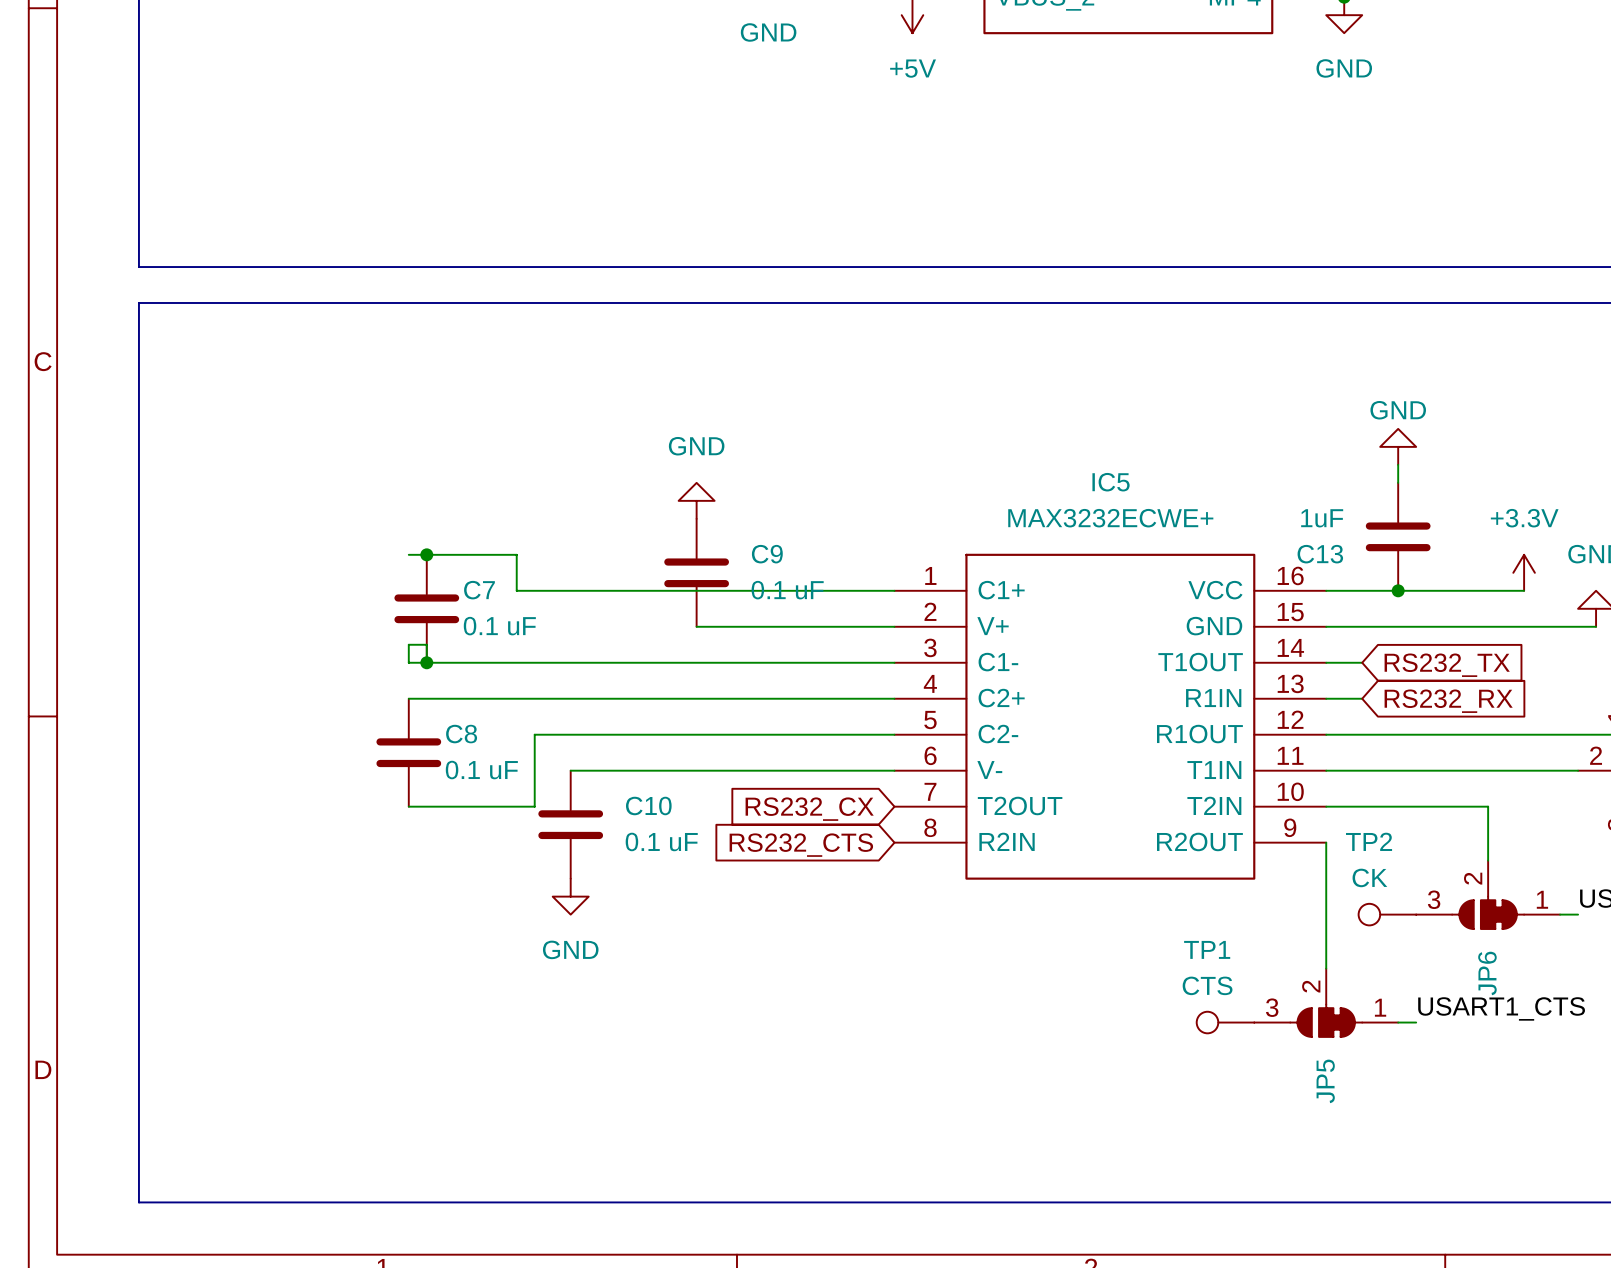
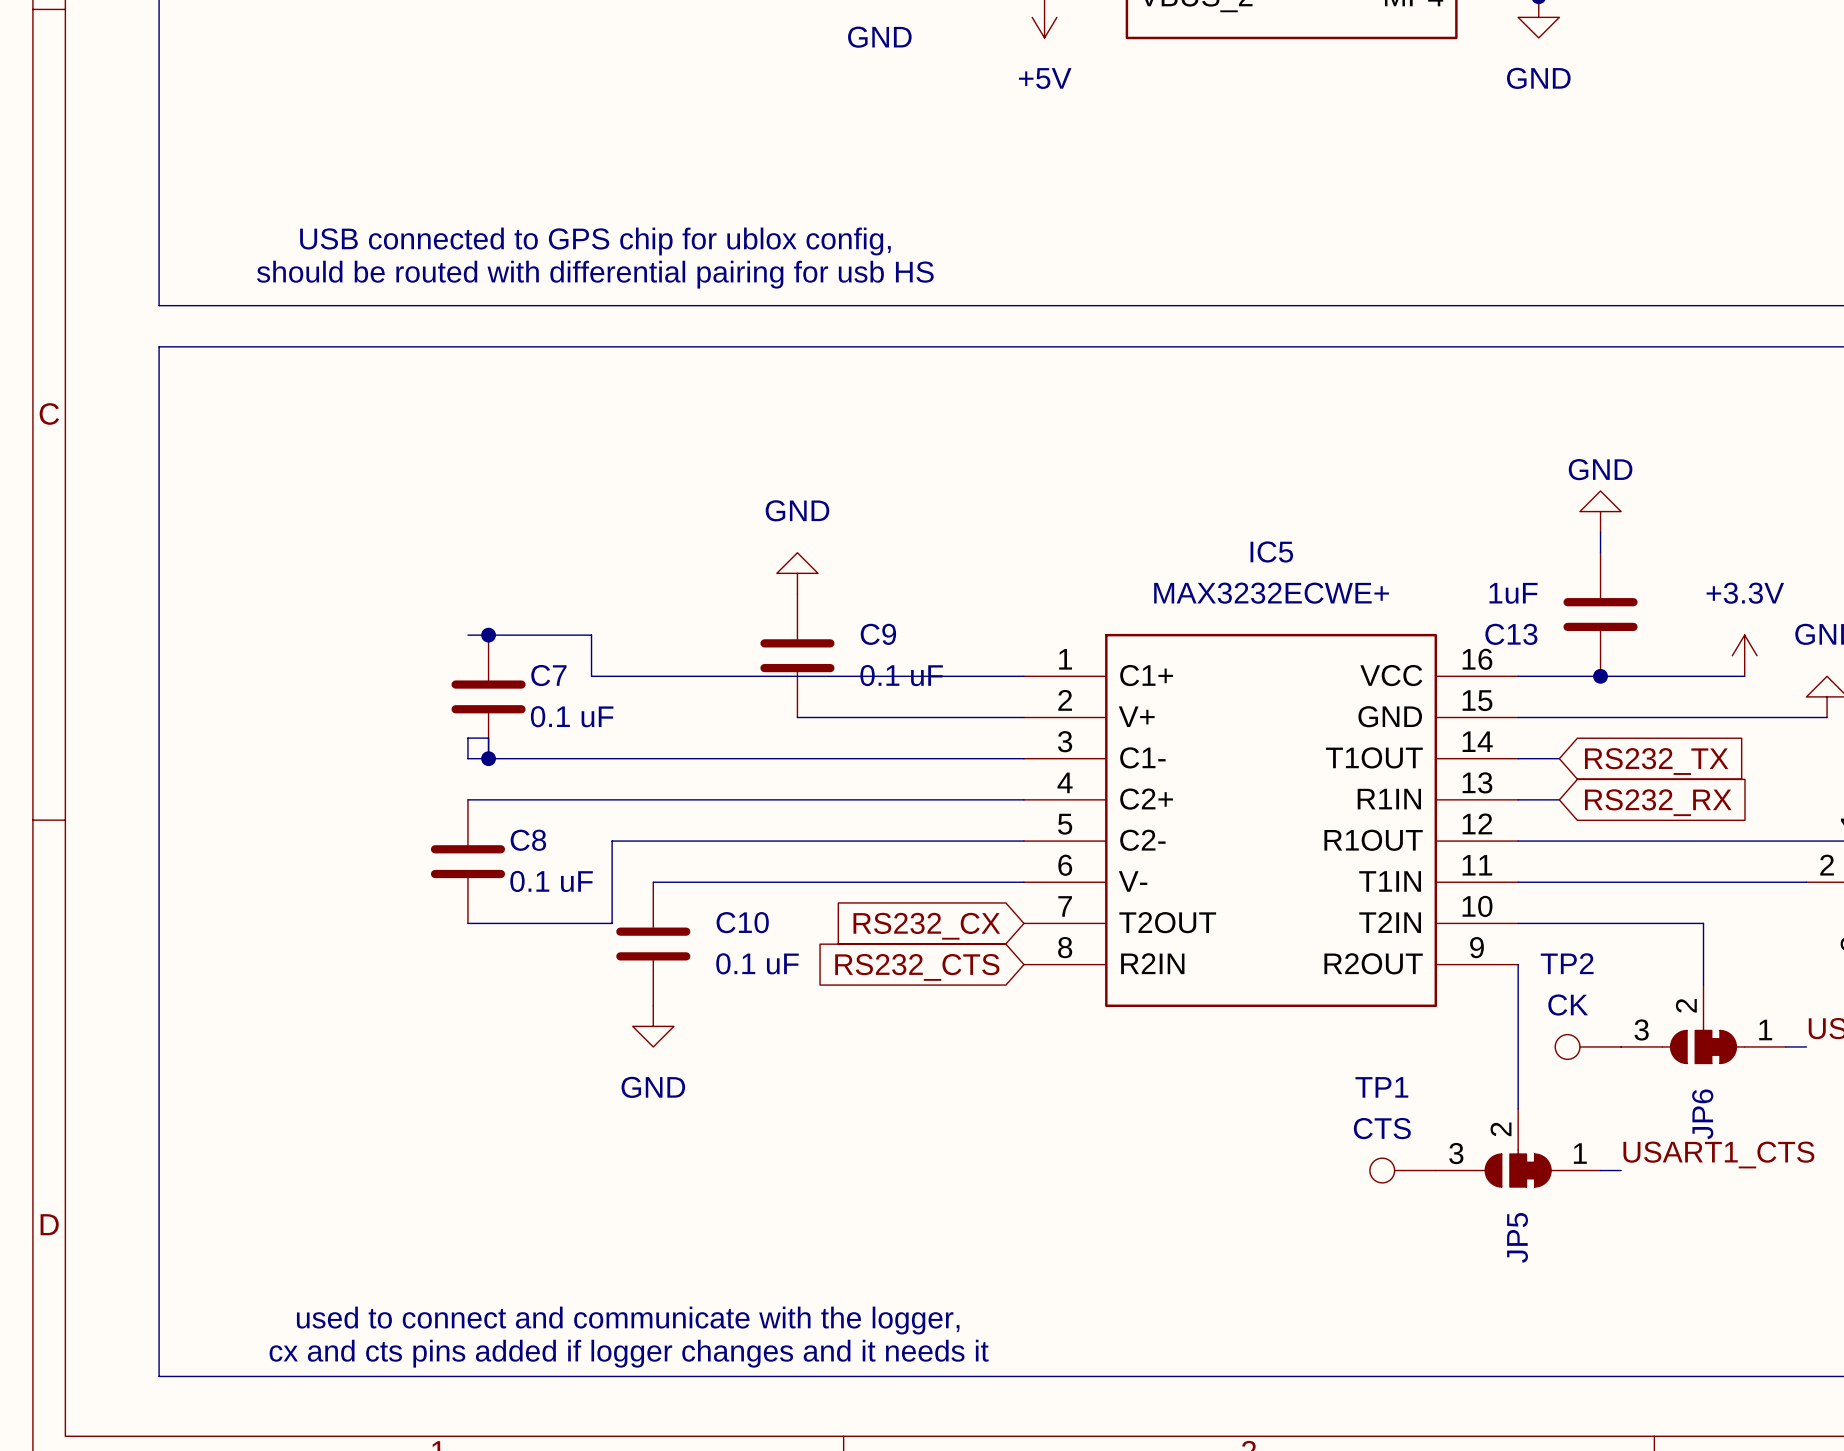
text: none -> USB connected to GPS chip for ublox config, (595, 241)
text: none -> should be routed with differential pairing for usb HS (595, 274)
text: none -> used to connect and communicate with the logger, (628, 1320)
text: none -> cx and cts pins added if logger changes and it needs it (629, 1353)

